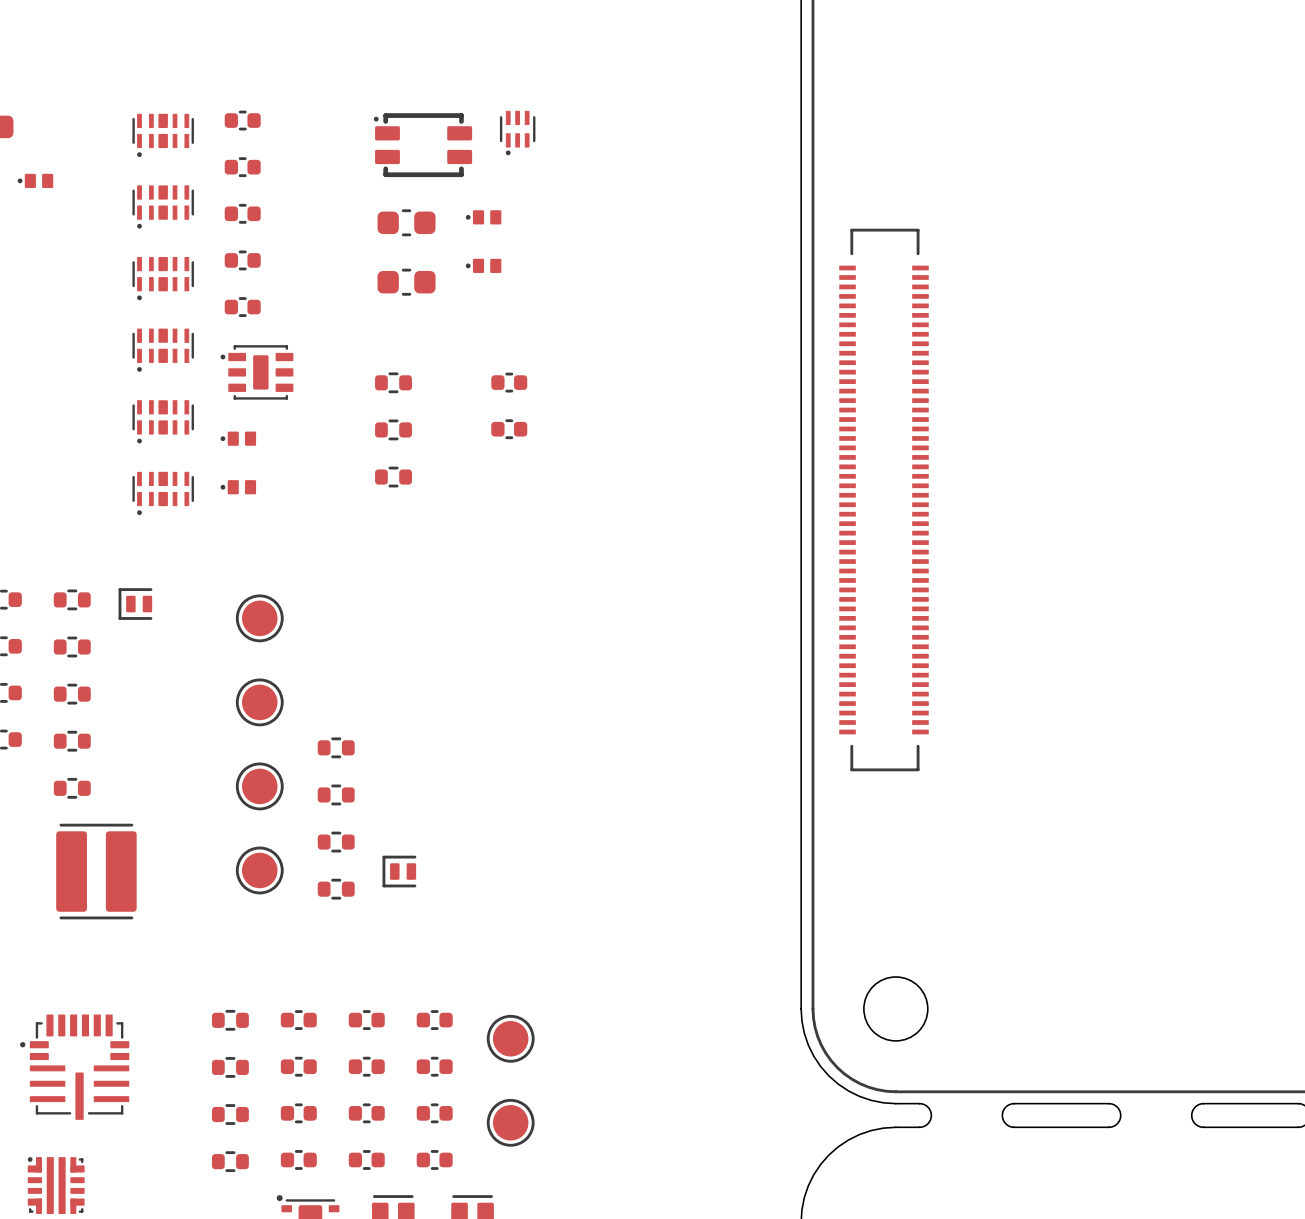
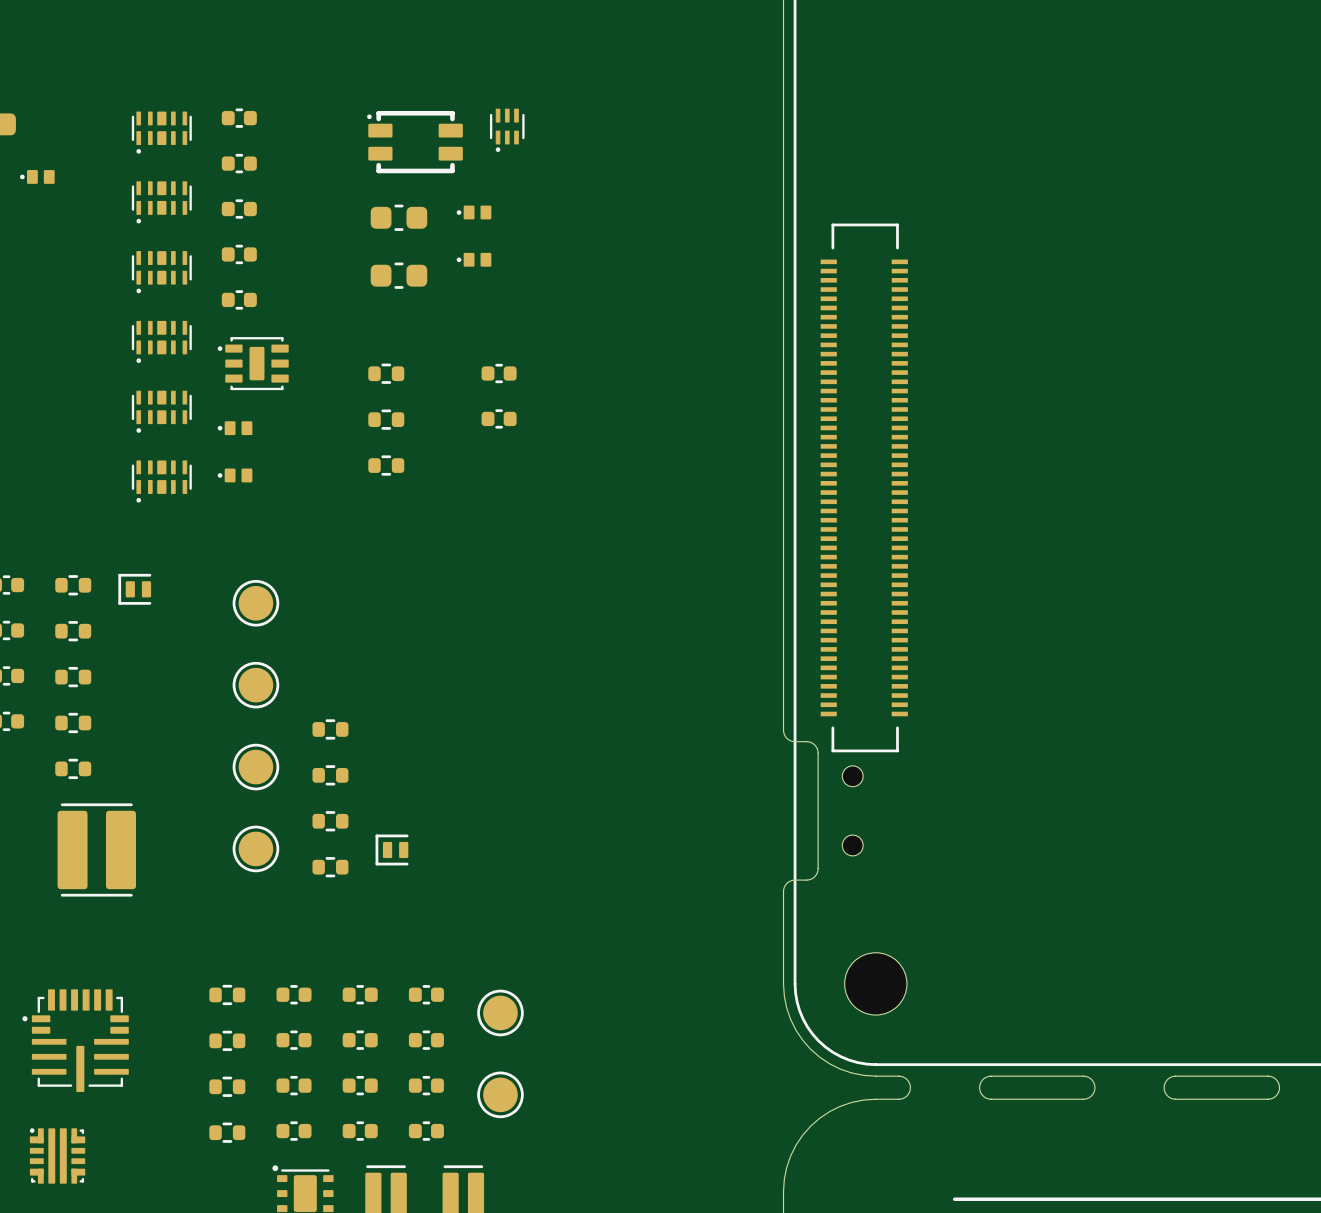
board edge: (801, 748) (801, 914) -> (783, 730) (785, 737) (790, 740) (812, 743) (816, 747) (818, 753) (817, 871) (811, 879) (789, 881) (785, 885) (783, 891)
part: none -> (852, 810)

